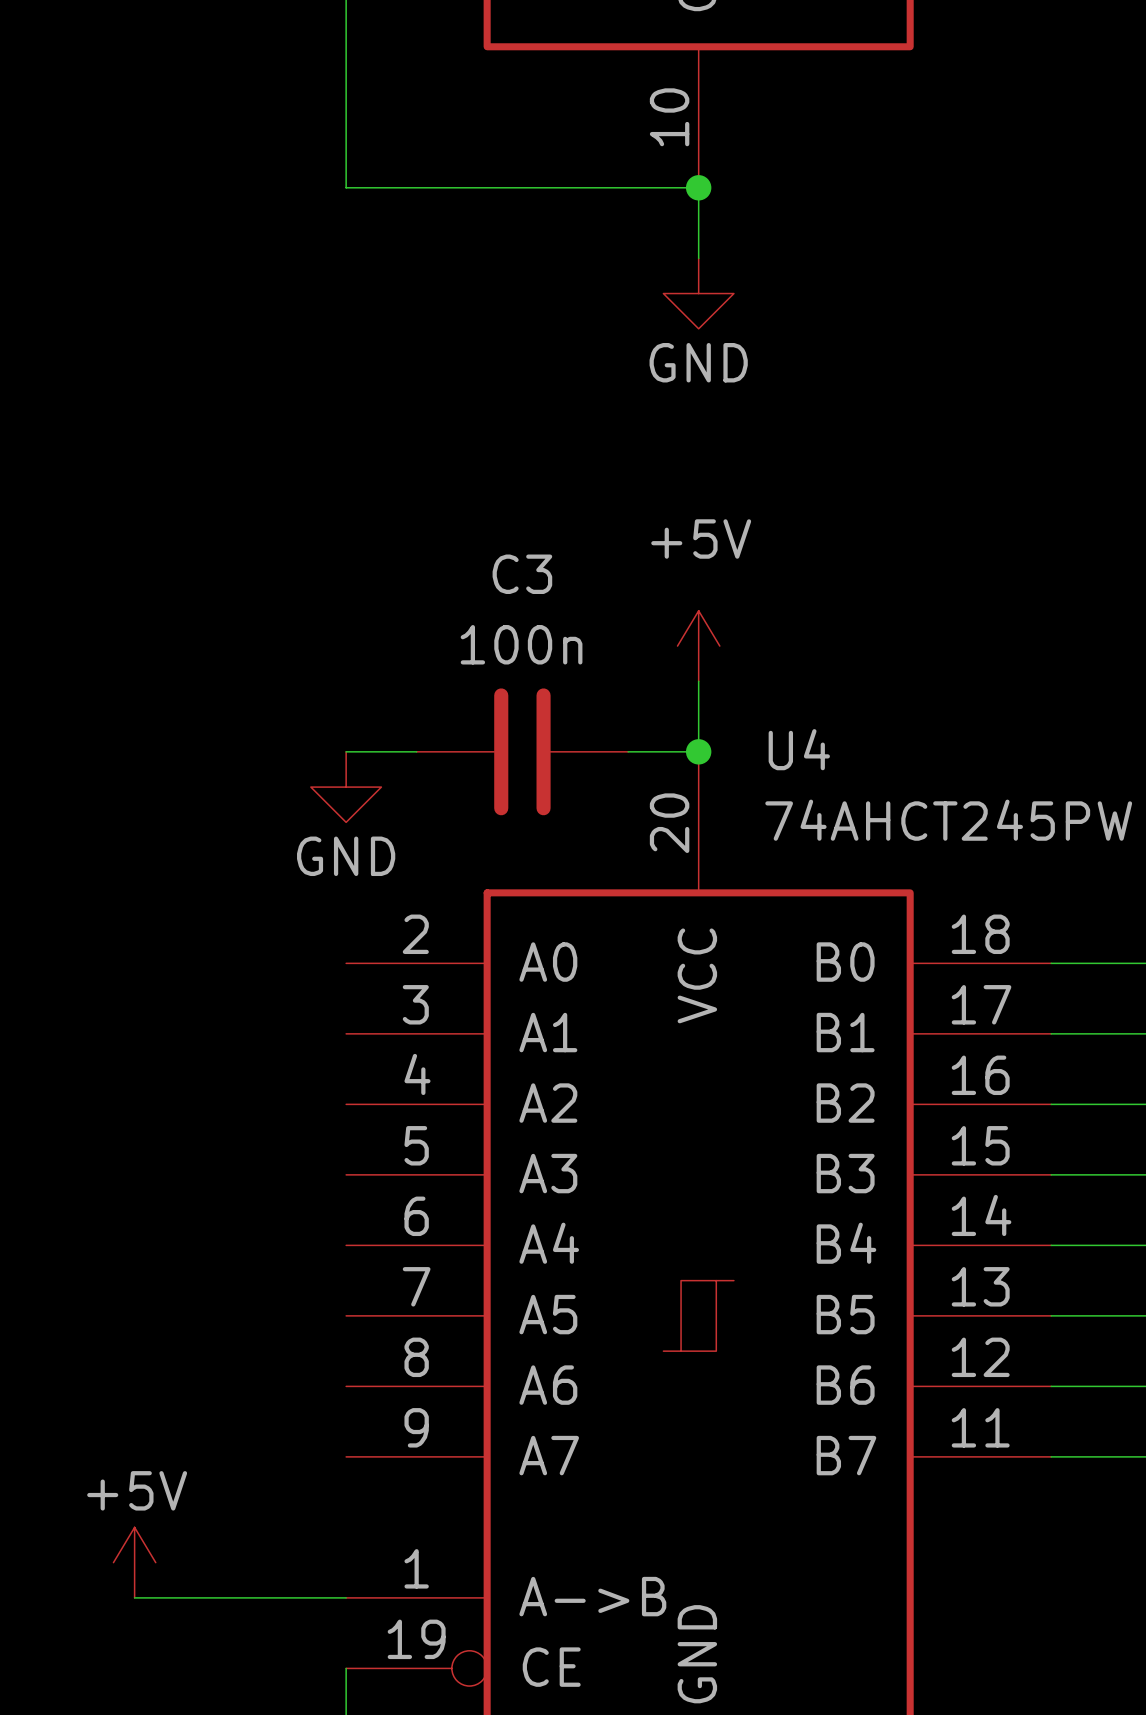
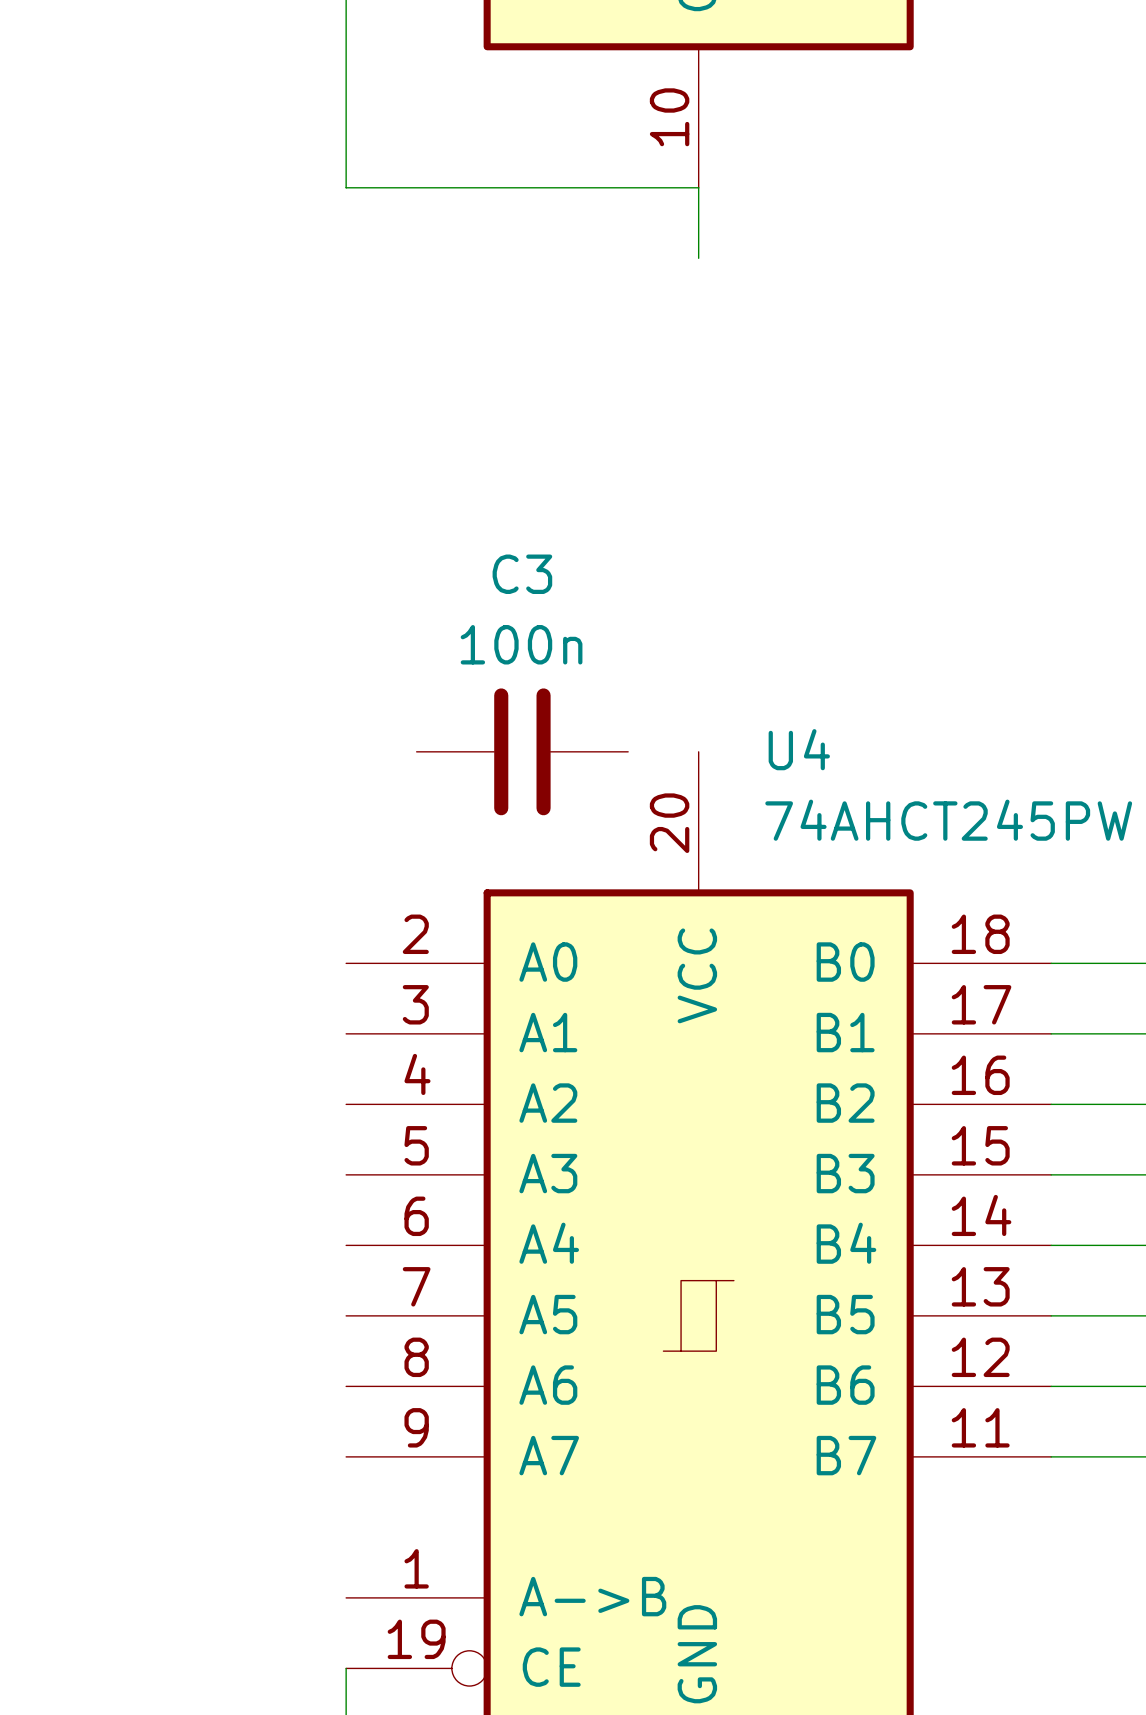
junction: (698, 187) -> none
power symbol: GND (698, 293) -> none
power symbol: +5V (698, 646) -> none
wire: (698, 681) (698, 751) (628, 751) -> none
wire: (346, 751) (416, 751) -> none
junction: (698, 751) -> none
power symbol: GND (346, 787) -> none
power symbol: +5V (134, 1562) -> none
wire: (134, 1597) (346, 1597) -> none

